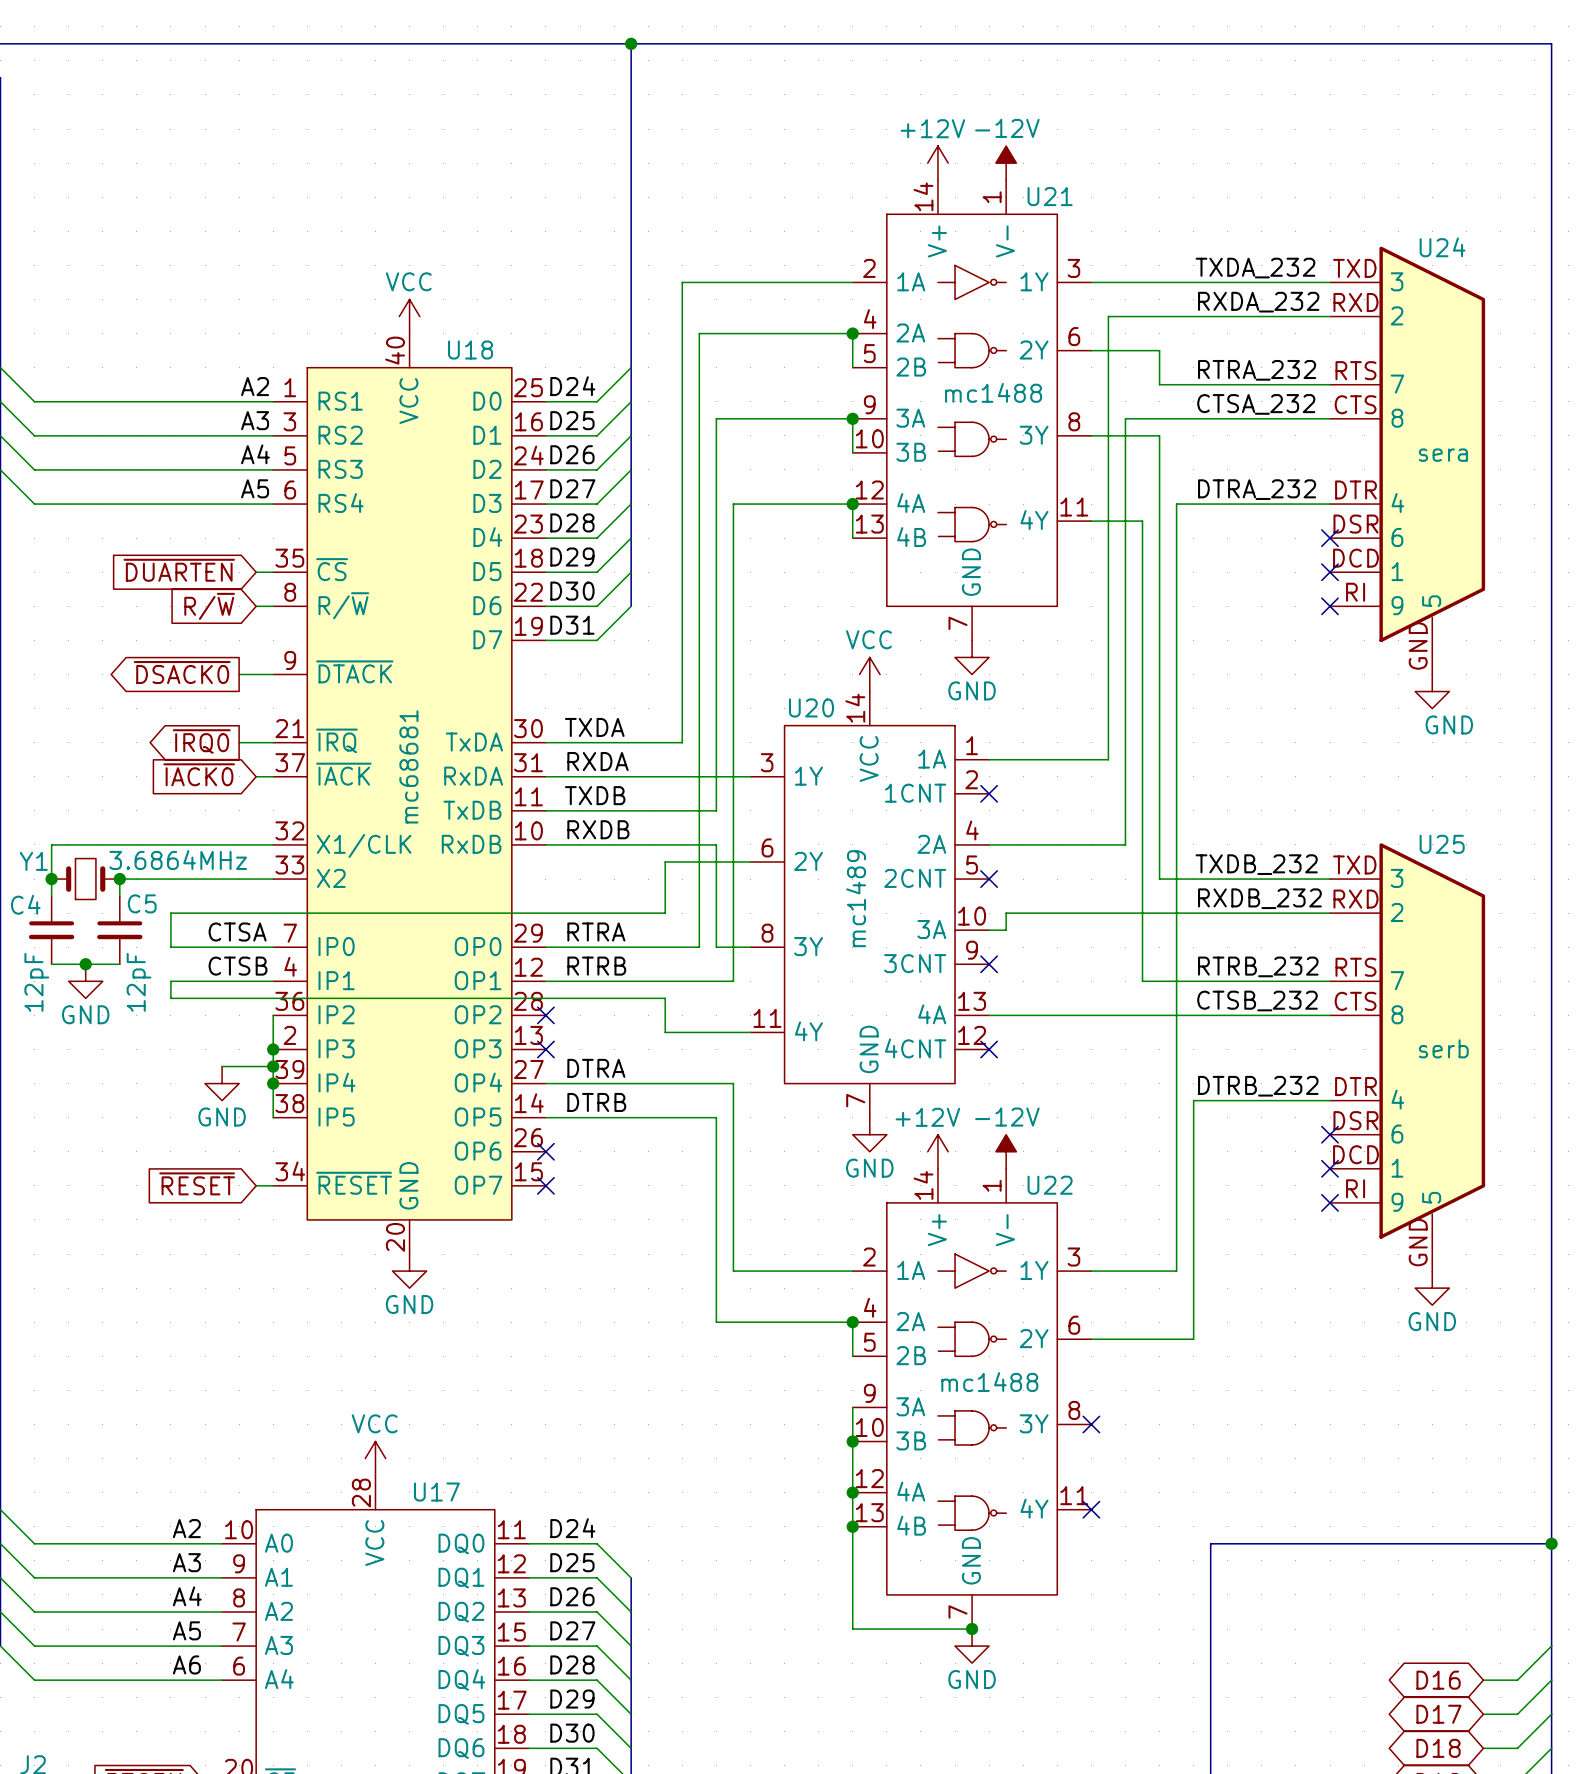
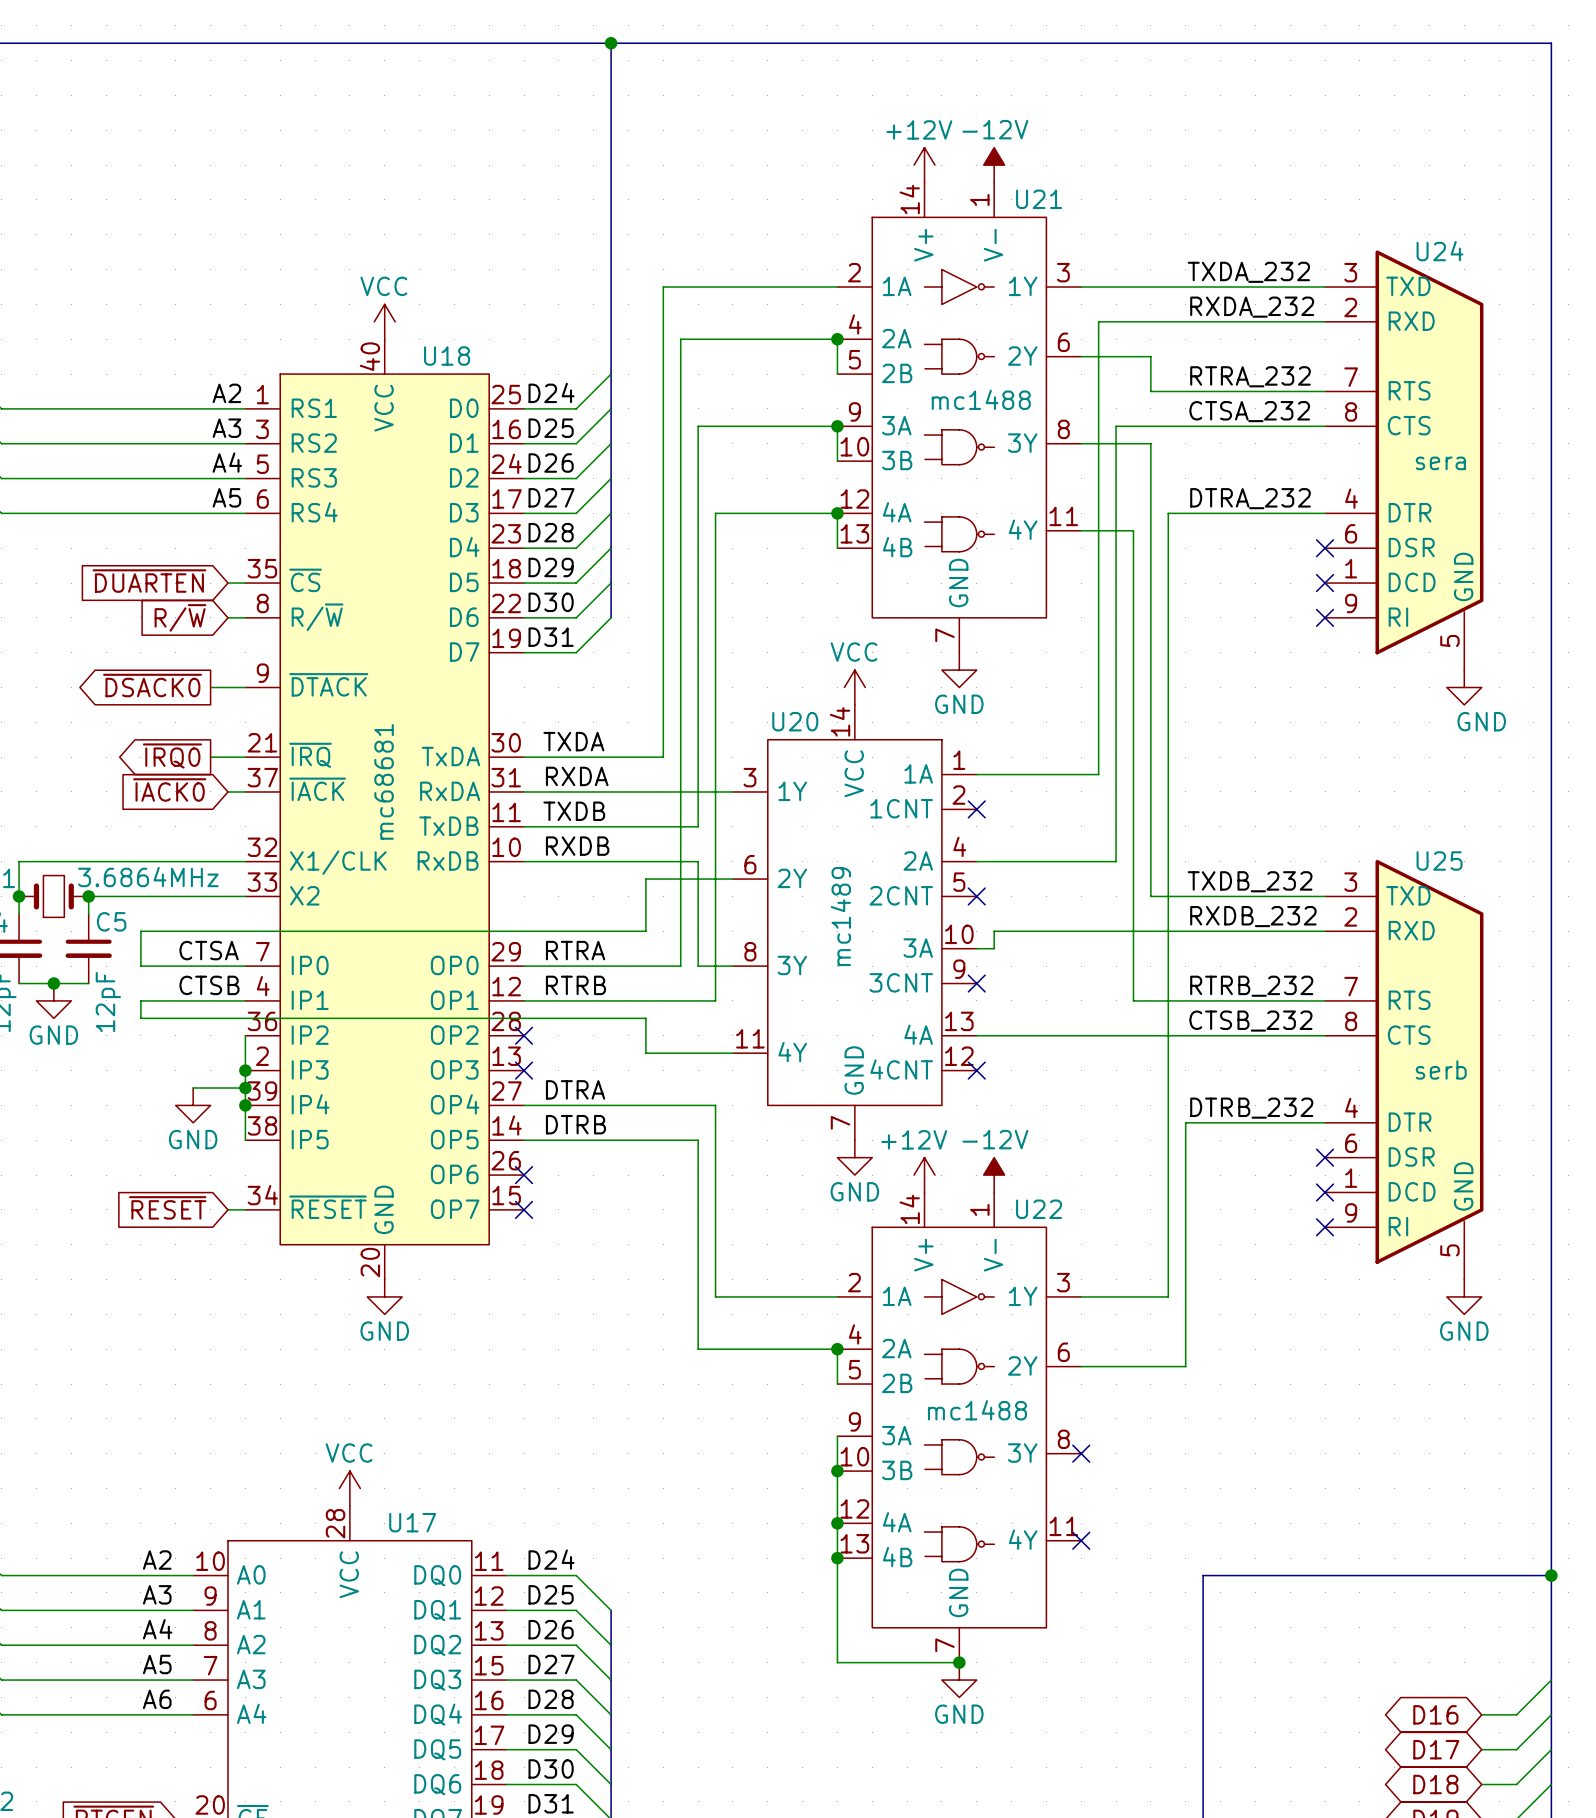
U24 symbol: [1330, 246, 1486, 675] -> [1325, 250, 1484, 671]
power symbol position: GND (1432, 691) -> GND (1464, 687)
U25 symbol: [1330, 843, 1486, 1272] -> [1325, 859, 1484, 1280]
power symbol position: GND (1432, 1288) -> GND (1464, 1296)

